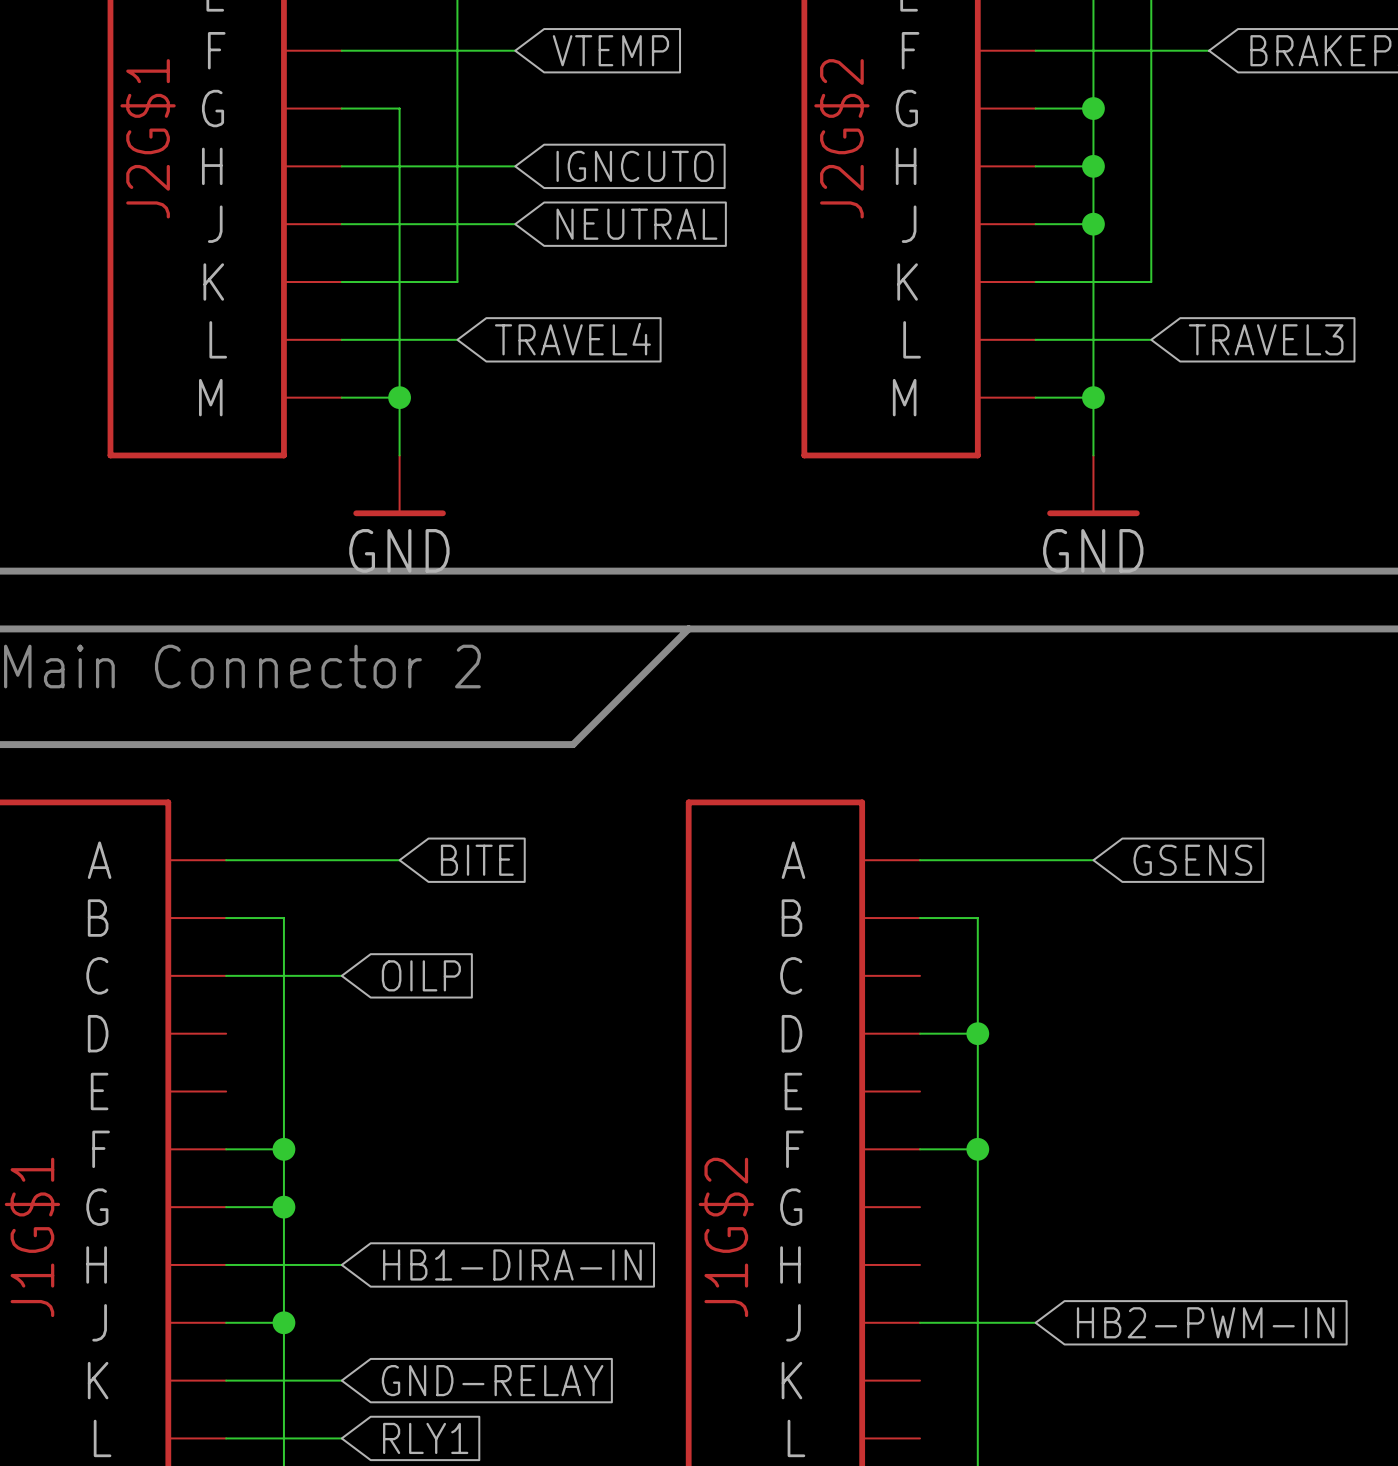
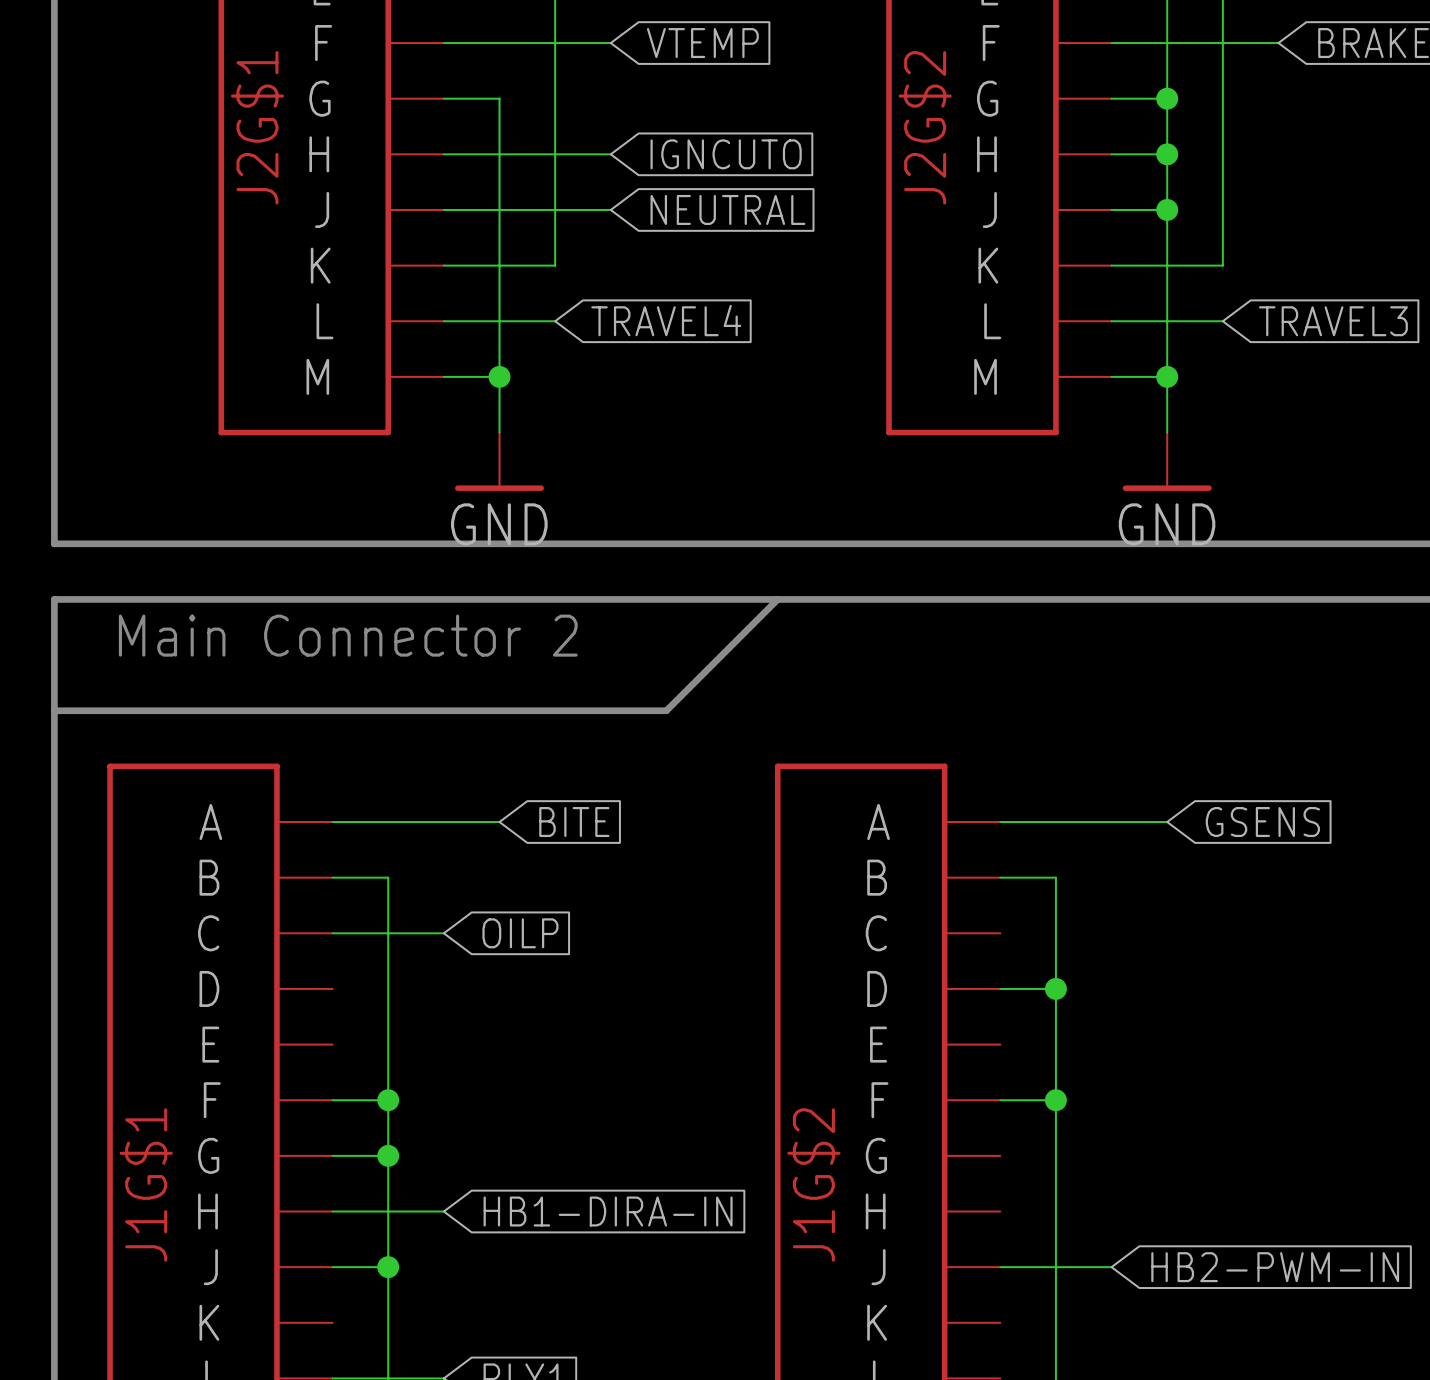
wire: (226, 1380) (341, 1380) -> none
global label: GND-RELAY (492, 1380) -> none

